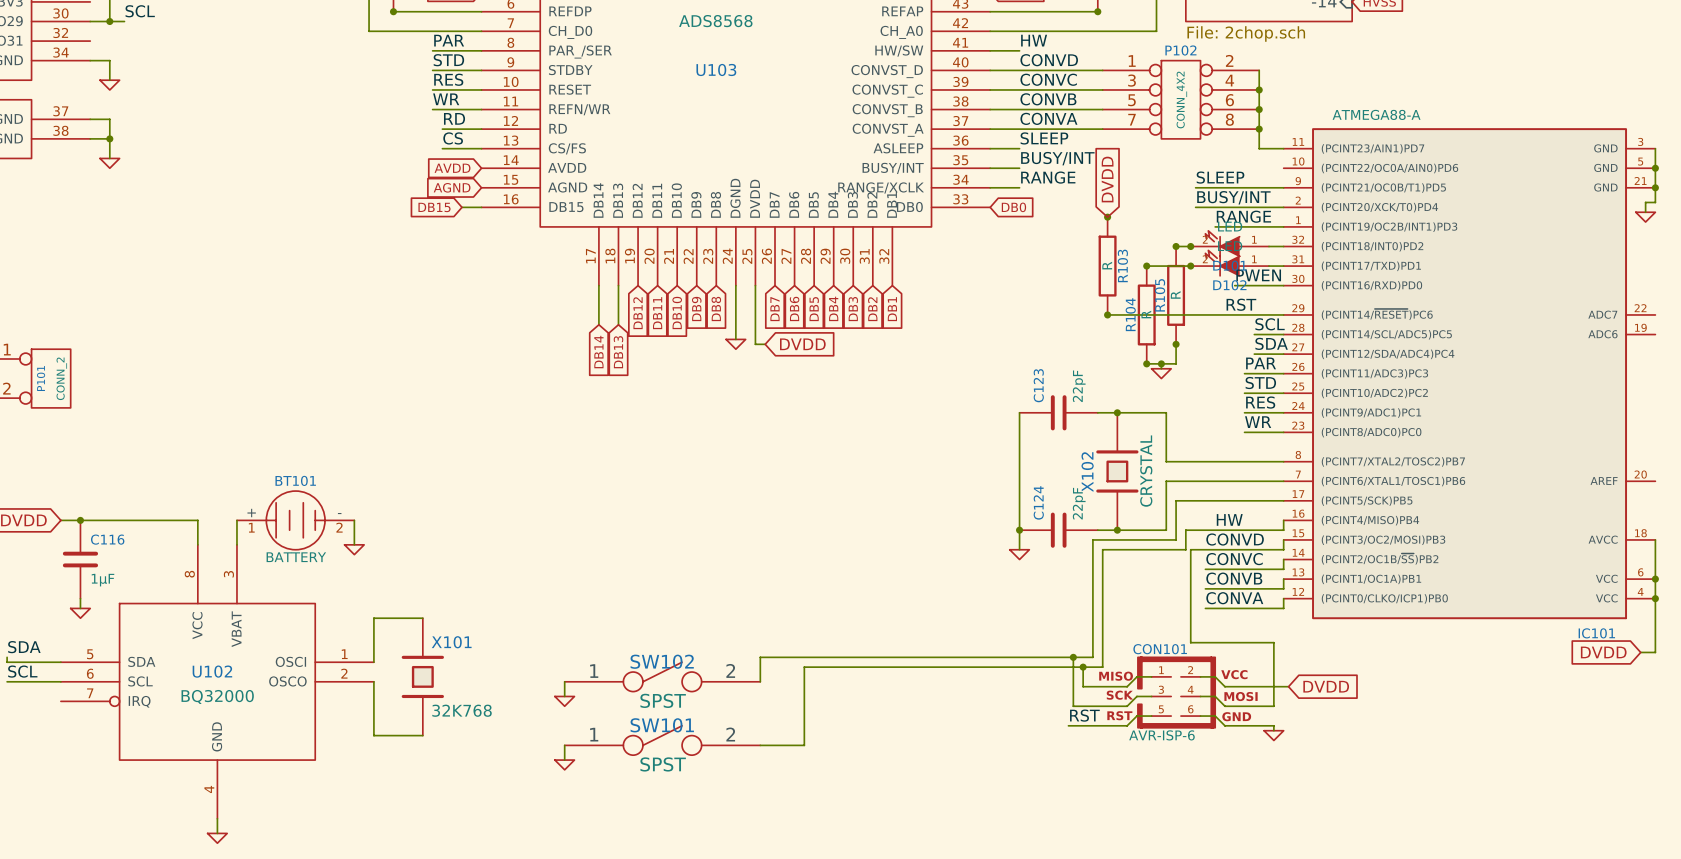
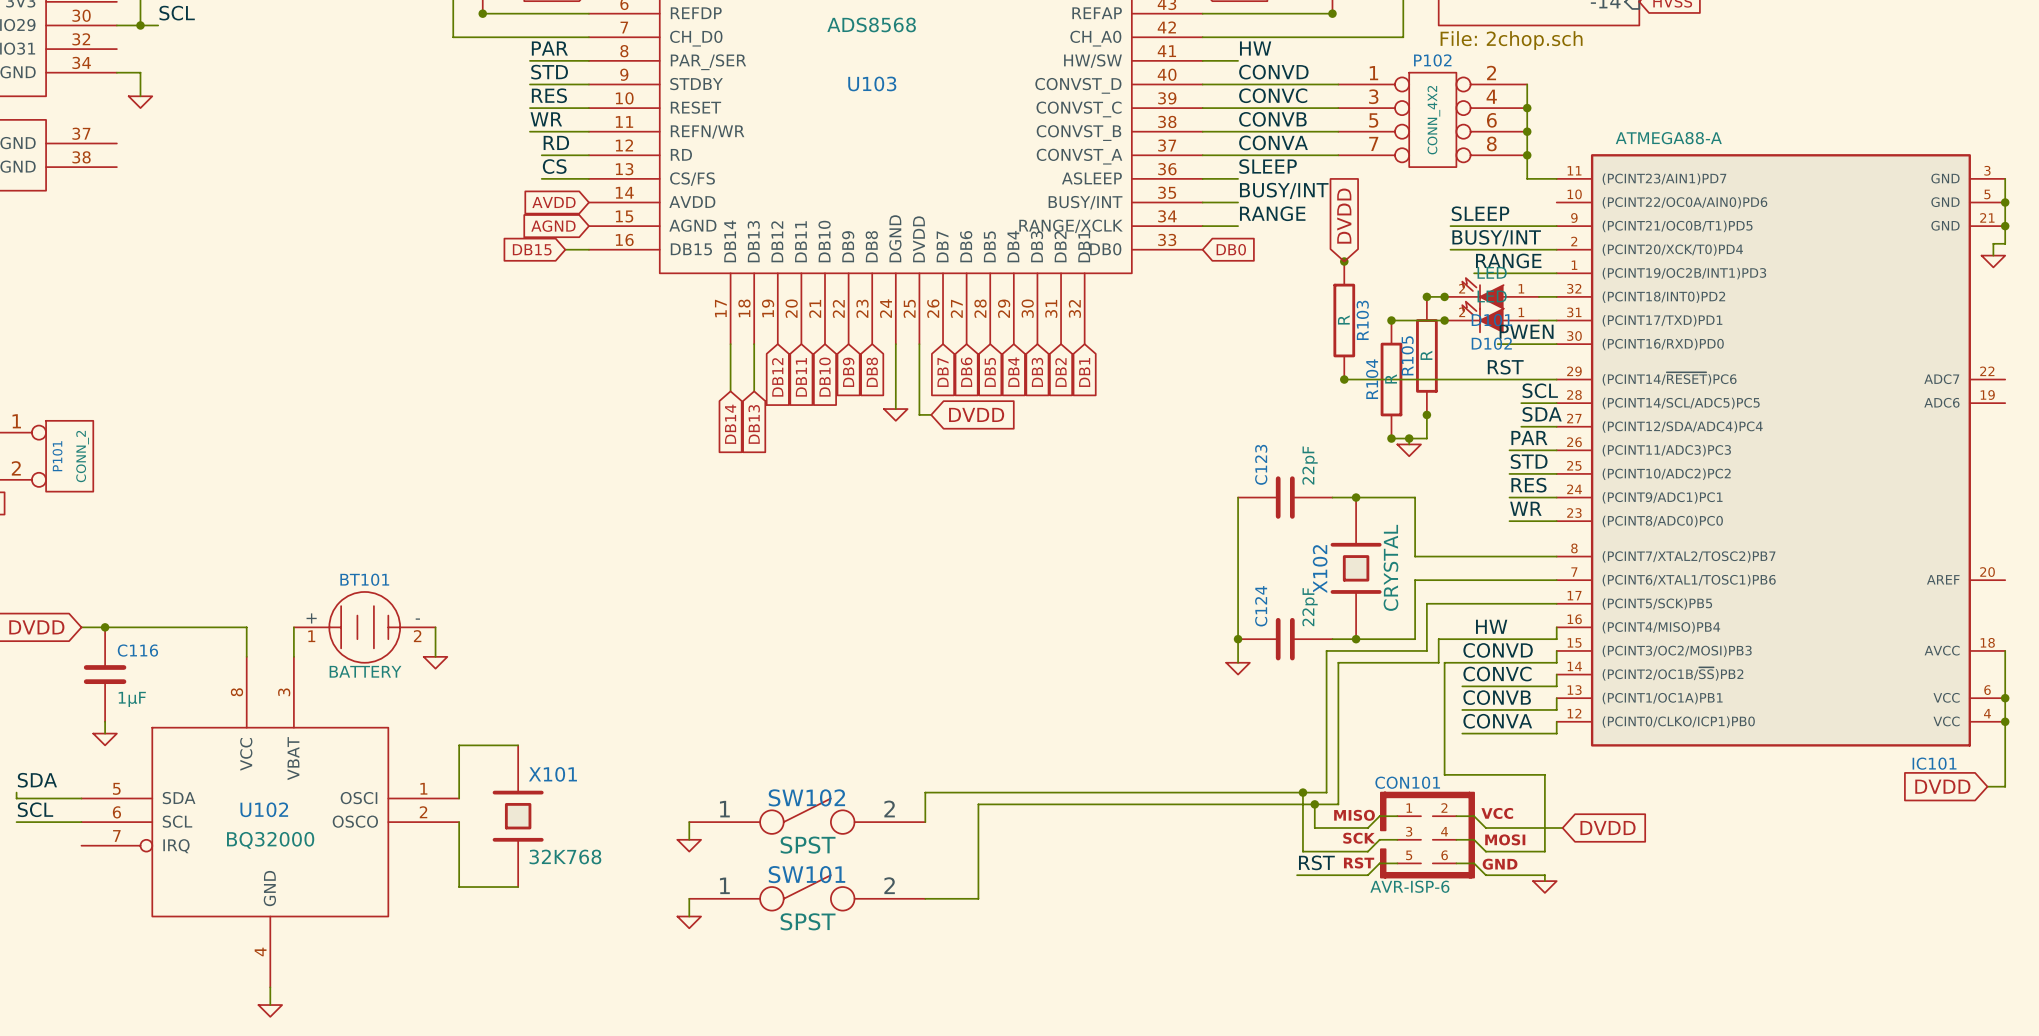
wire: (90, 119) (109, 119) (109, 158) -> none
wire: (90, 138) (109, 138) -> none
junction: (109, 138) -> none
power symbol: (109, 163) -> none

